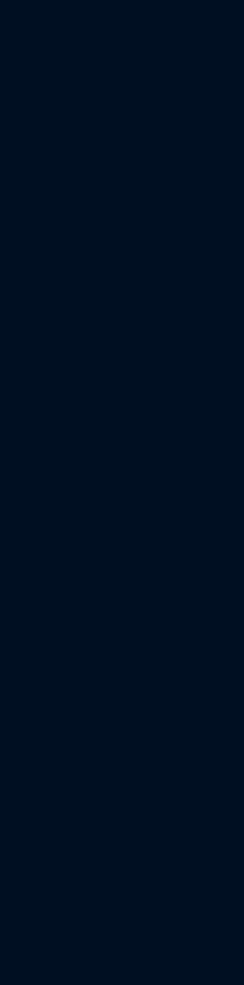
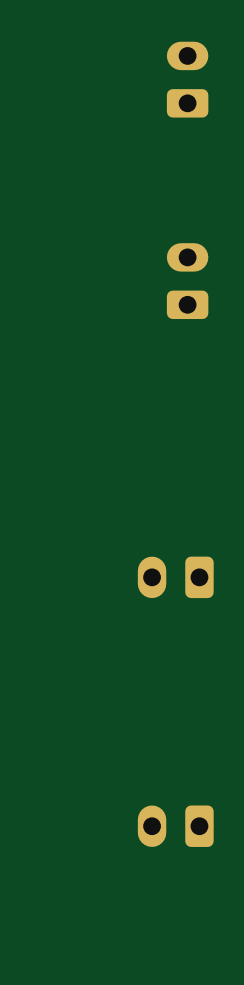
part: none -> (187, 79)
part: none -> (187, 281)
part: none -> (175, 577)
part: none -> (175, 826)

